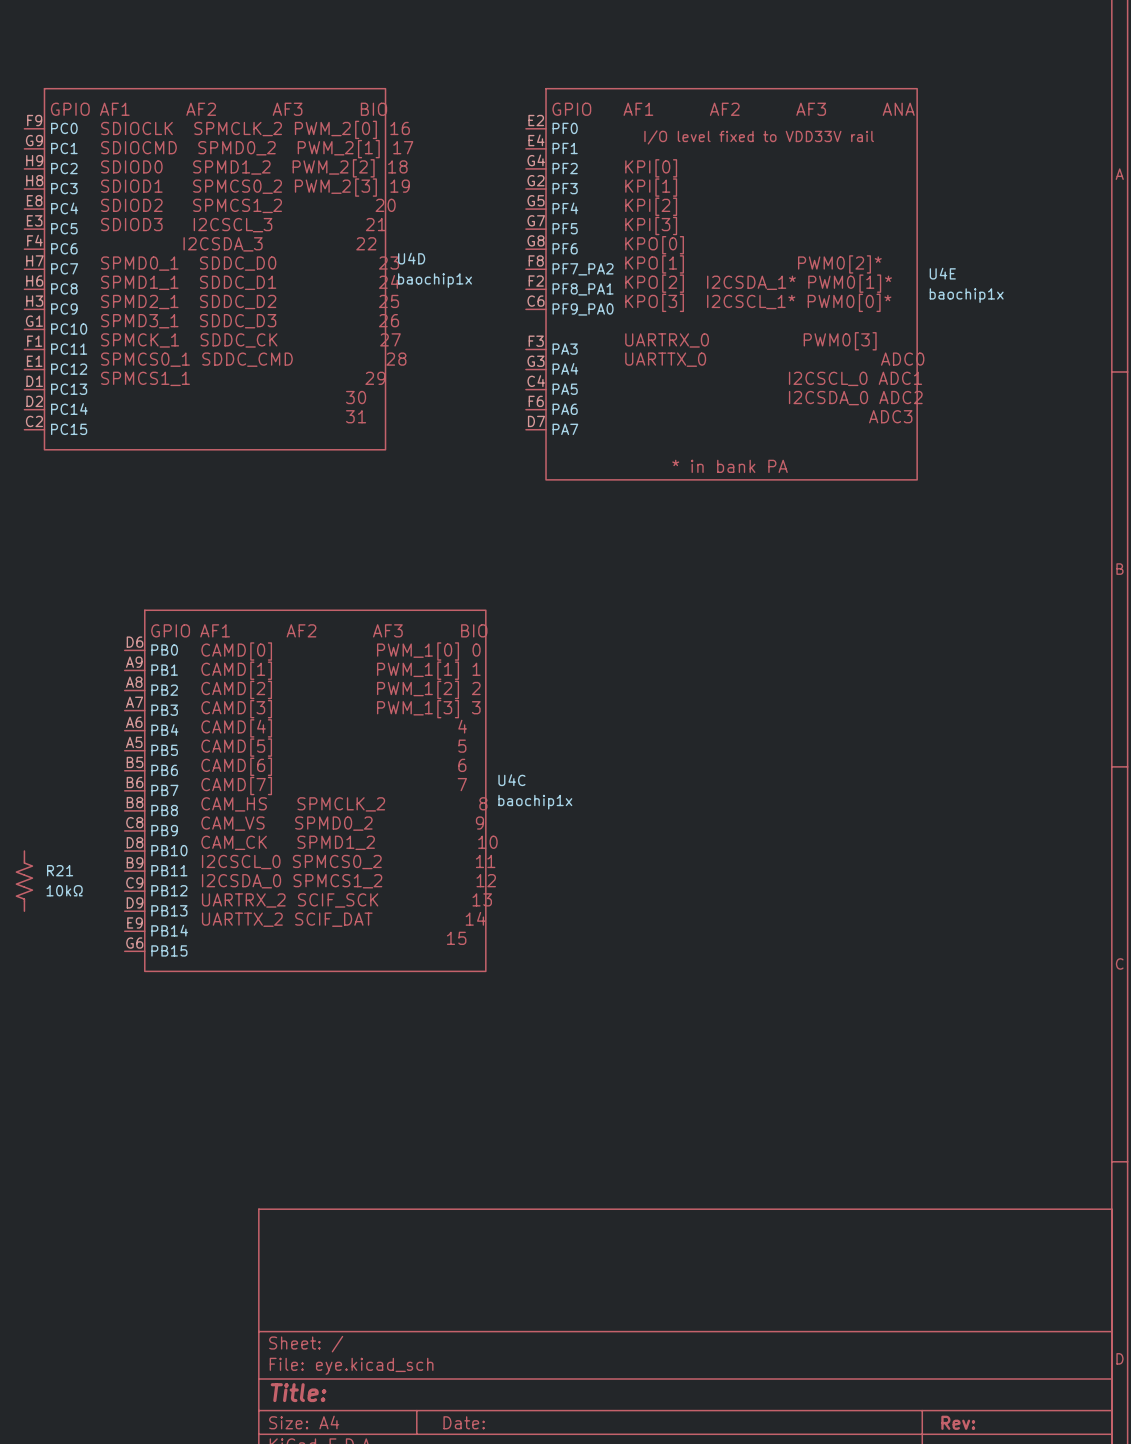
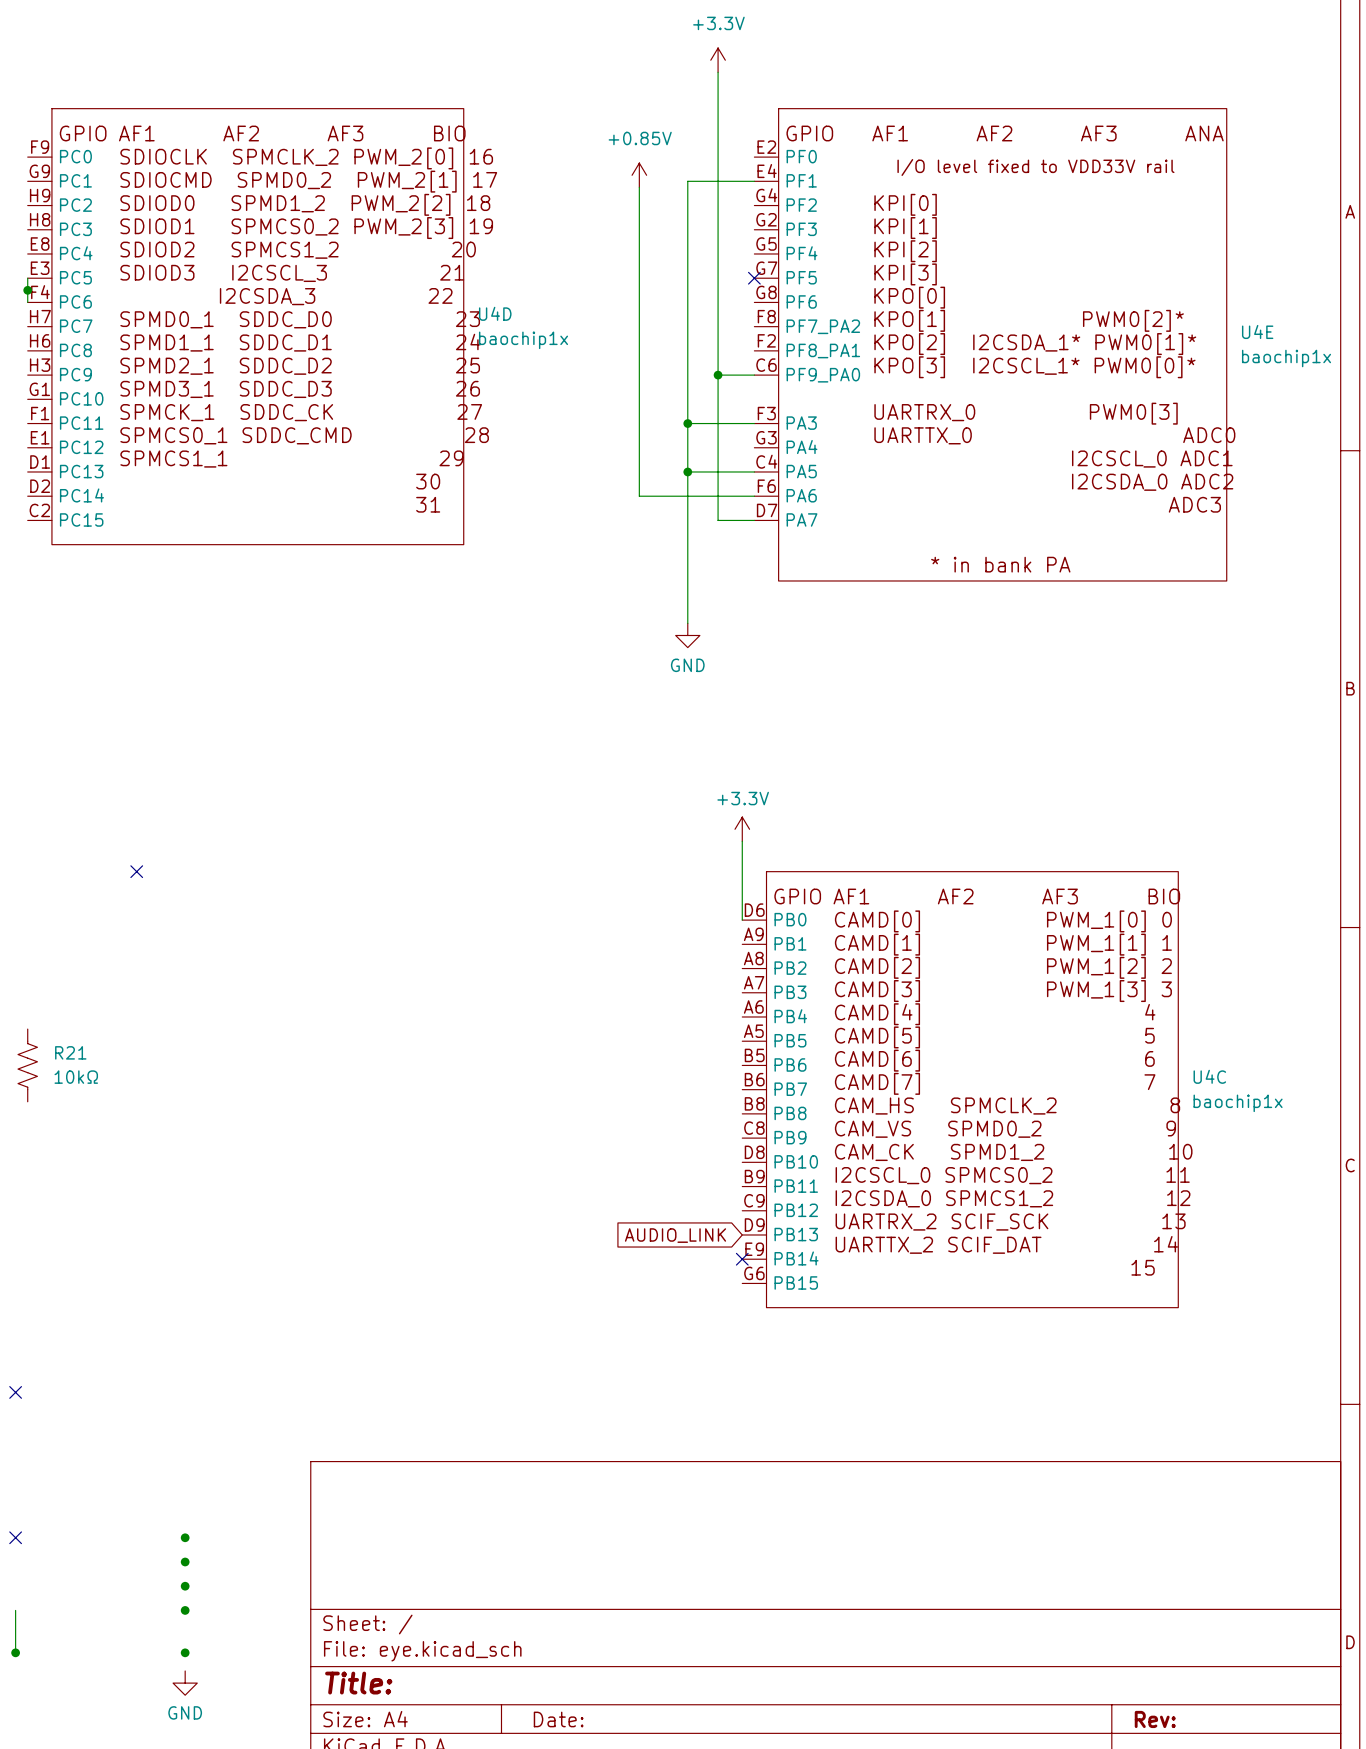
power symbol: none -> +3.3V (718, 60)
wire: none -> (718, 72) (718, 520) (754, 520)
power symbol: none -> +0.85V (639, 175)
wire: none -> (754, 181) (687, 181) (687, 623)
wire: none -> (639, 187) (639, 496) (754, 496)
wire: none -> (27, 278) (27, 302)
no-connect mark: none -> (754, 278)
junction: none -> (27, 290)
U4E position: (721, 284) -> (990, 344)
wire: none -> (718, 375) (754, 375)
junction: none -> (718, 375)
wire: none -> (687, 423) (754, 423)
junction: none -> (687, 423)
wire: none -> (687, 471) (754, 471)
junction: none -> (687, 471)
power symbol: none -> GND (687, 635)
power symbol: none -> +3.3V (742, 829)
wire: none -> (742, 841) (742, 920)
no-connect mark: none -> (136, 871)
U4C position: (305, 790) -> (960, 1089)
global label: none -> AUDIO_LINK (675, 1235)
no-connect mark: none -> (742, 1259)
no-connect mark: none -> (15, 1392)
no-connect mark: none -> (15, 1537)
junction: none -> (185, 1537)
junction: none -> (185, 1561)
junction: none -> (185, 1586)
wire: none -> (15, 1610) (15, 1652)
junction: none -> (185, 1610)
junction: none -> (15, 1652)
junction: none -> (185, 1652)
power symbol: none -> GND (185, 1683)

